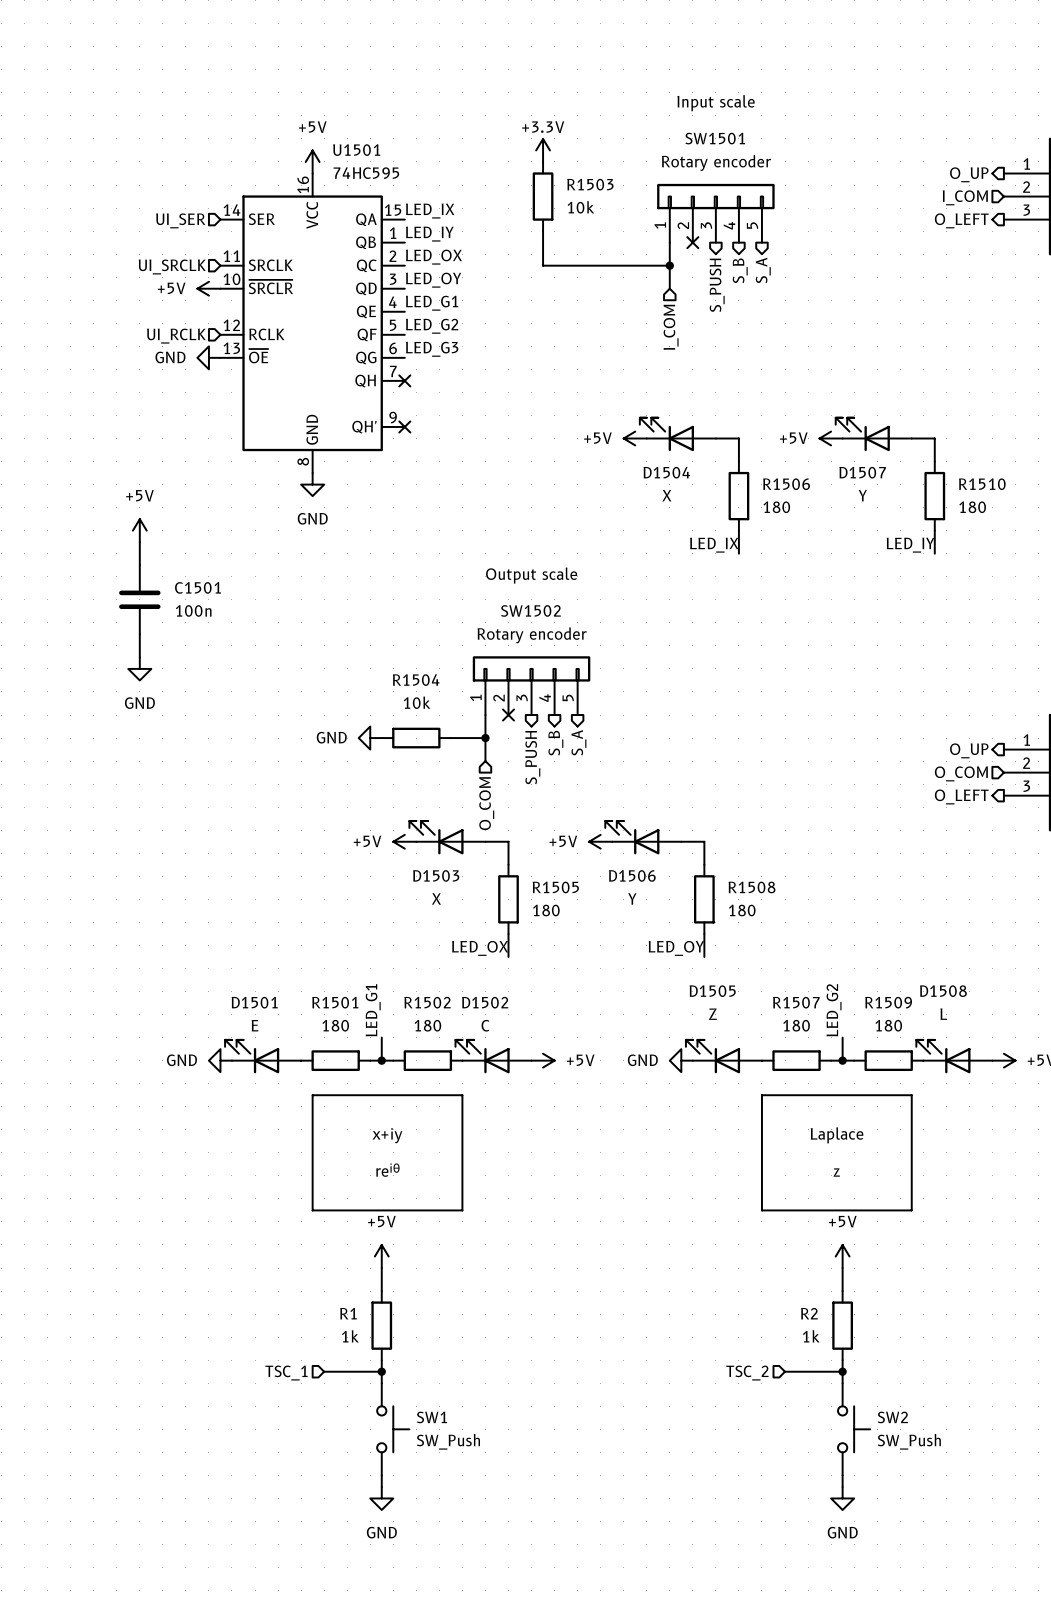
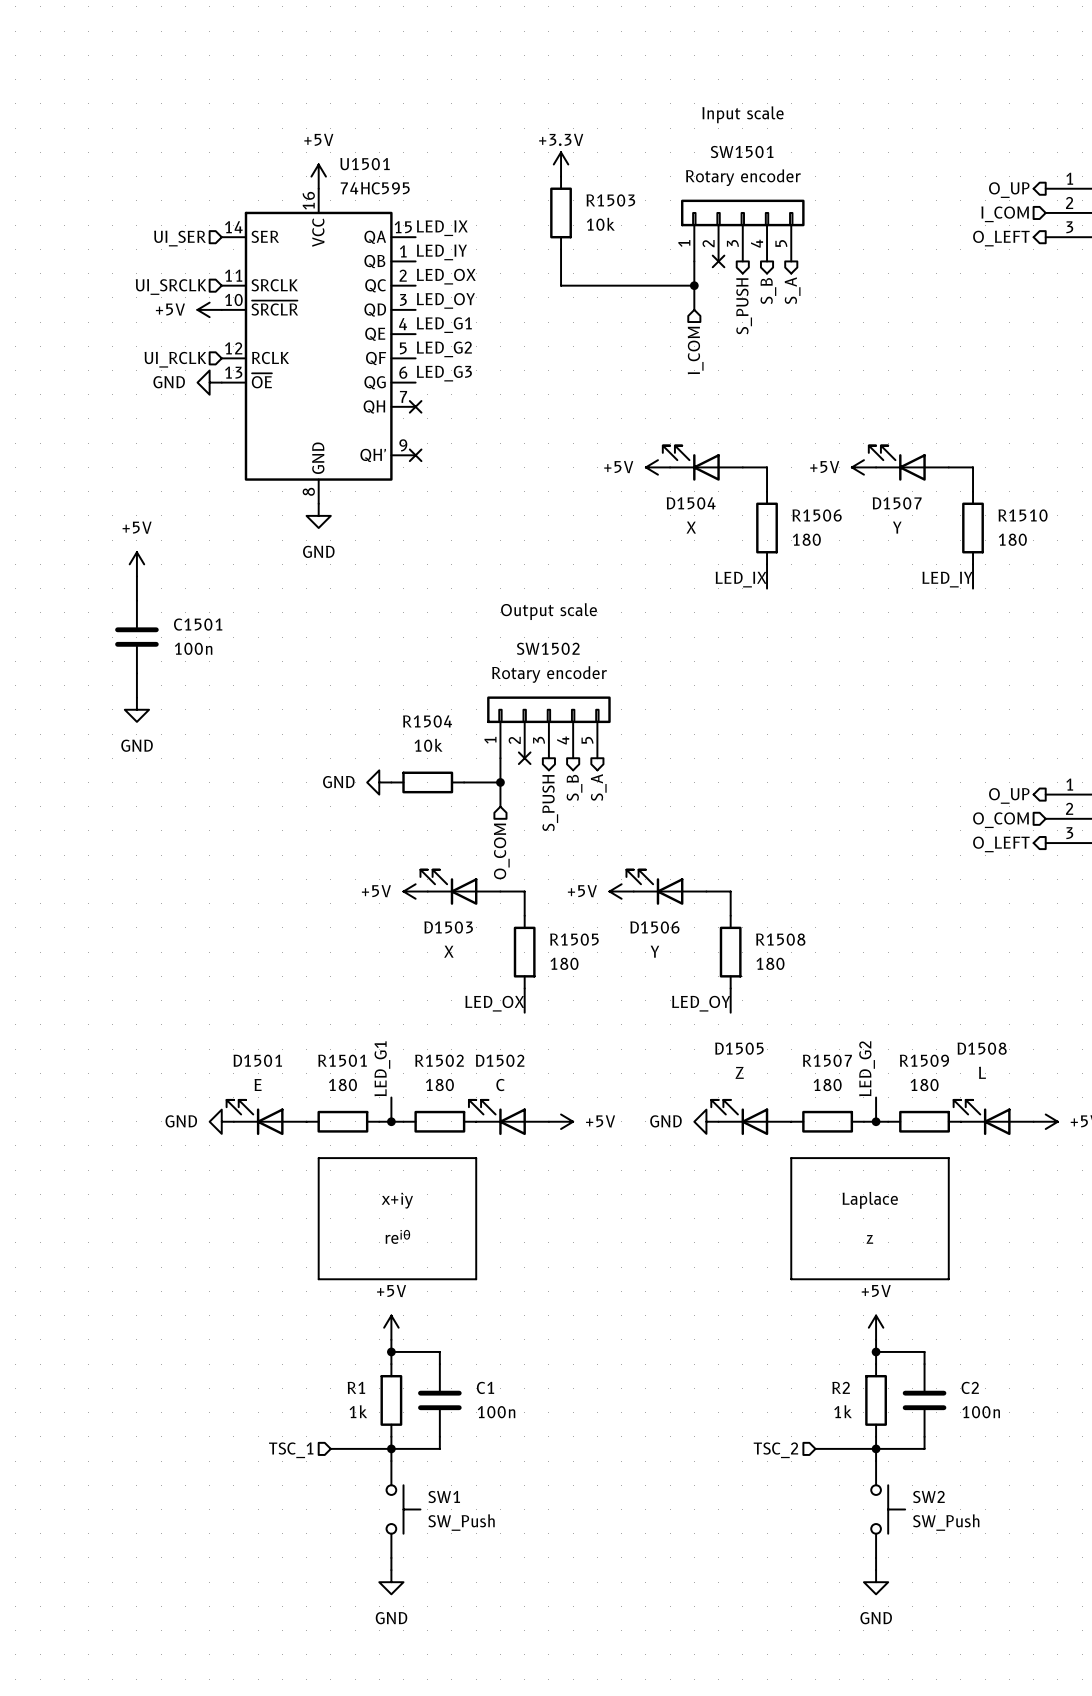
wire: none -> (391, 1351) (439, 1351) (439, 1364)
junction: none -> (391, 1351)
wire: none -> (876, 1351) (924, 1351) (924, 1364)
junction: none -> (876, 1351)
C1: none -> 100n (439, 1400)
C2: none -> 100n (924, 1400)
wire: none -> (439, 1436) (439, 1448) (391, 1448)
wire: none -> (924, 1436) (924, 1448) (876, 1448)

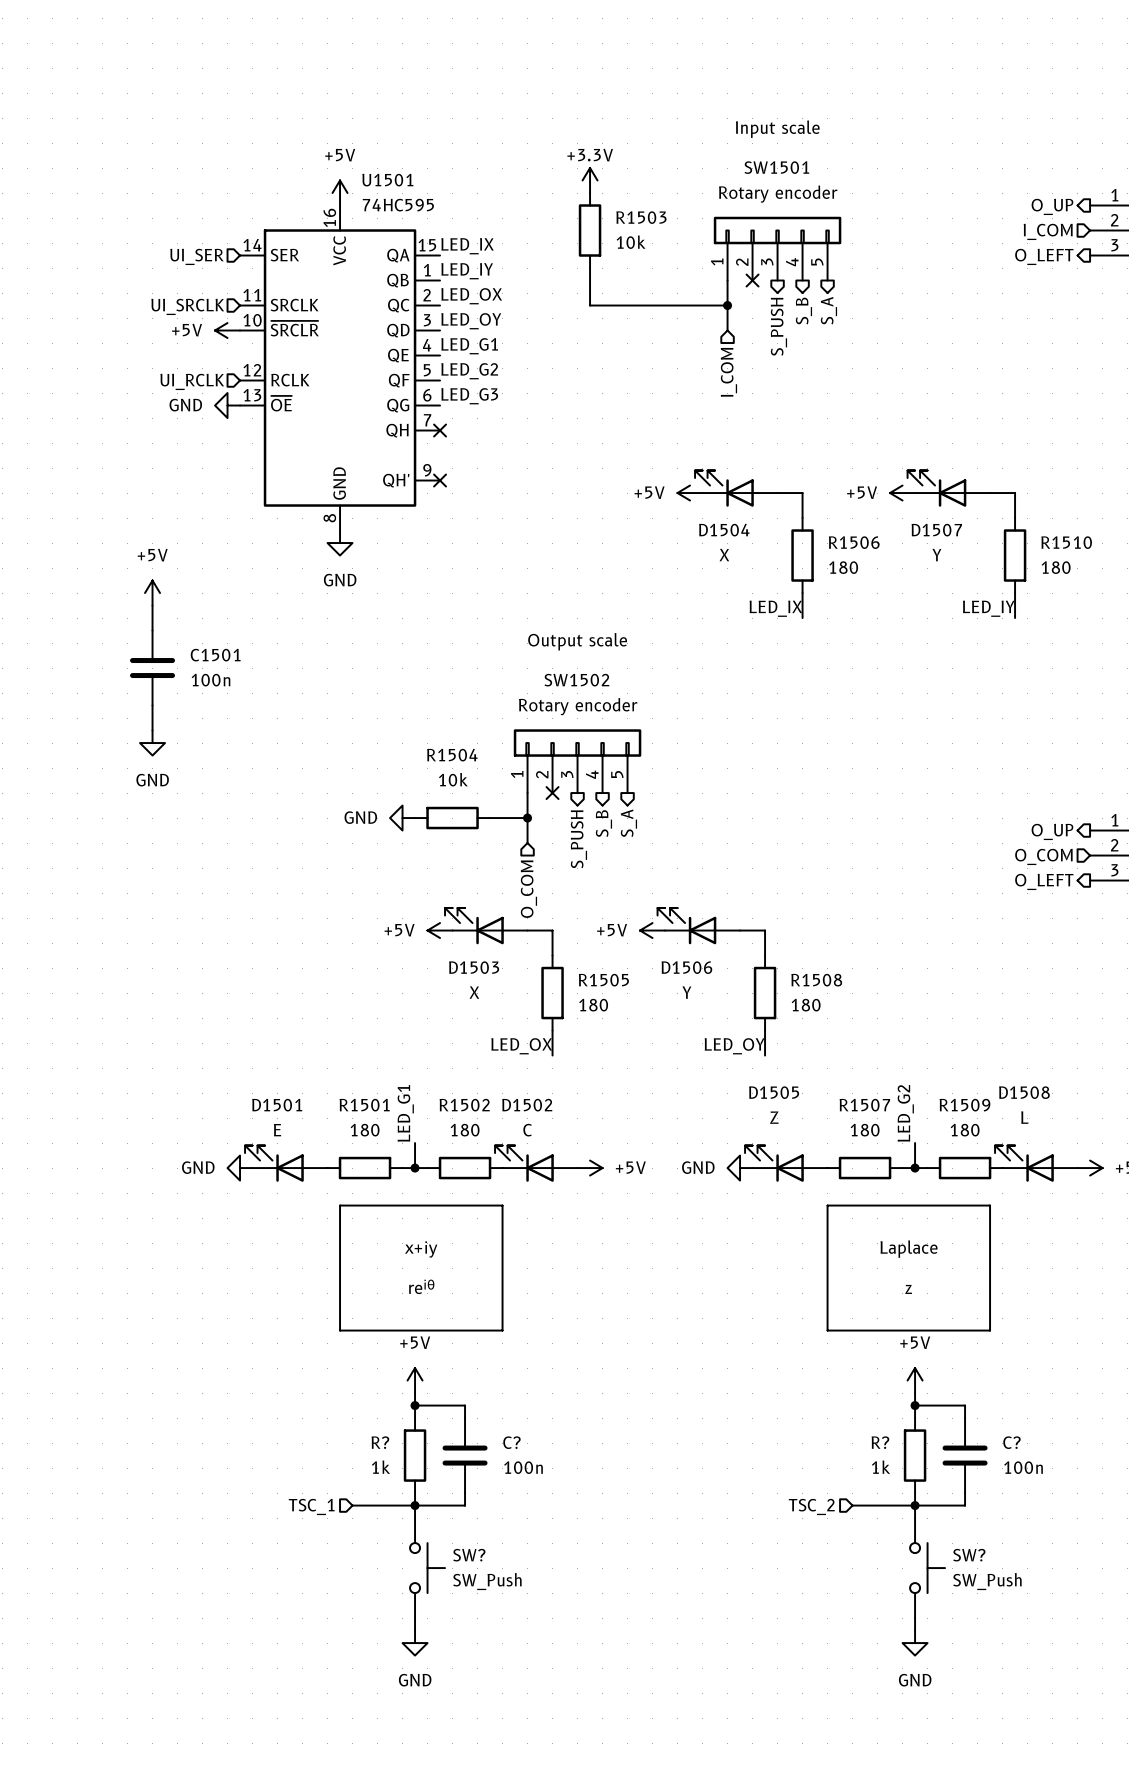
R1 name: R1 (356, 1387) -> R? (380, 1442)
C1 name: C1 (485, 1387) -> C? (511, 1442)
R2 name: R2 (841, 1387) -> R? (880, 1442)
C2 name: C2 (970, 1387) -> C? (1011, 1442)
SW1 name: SW1 (444, 1496) -> SW? (469, 1555)
SW2 name: SW2 (928, 1496) -> SW? (969, 1555)

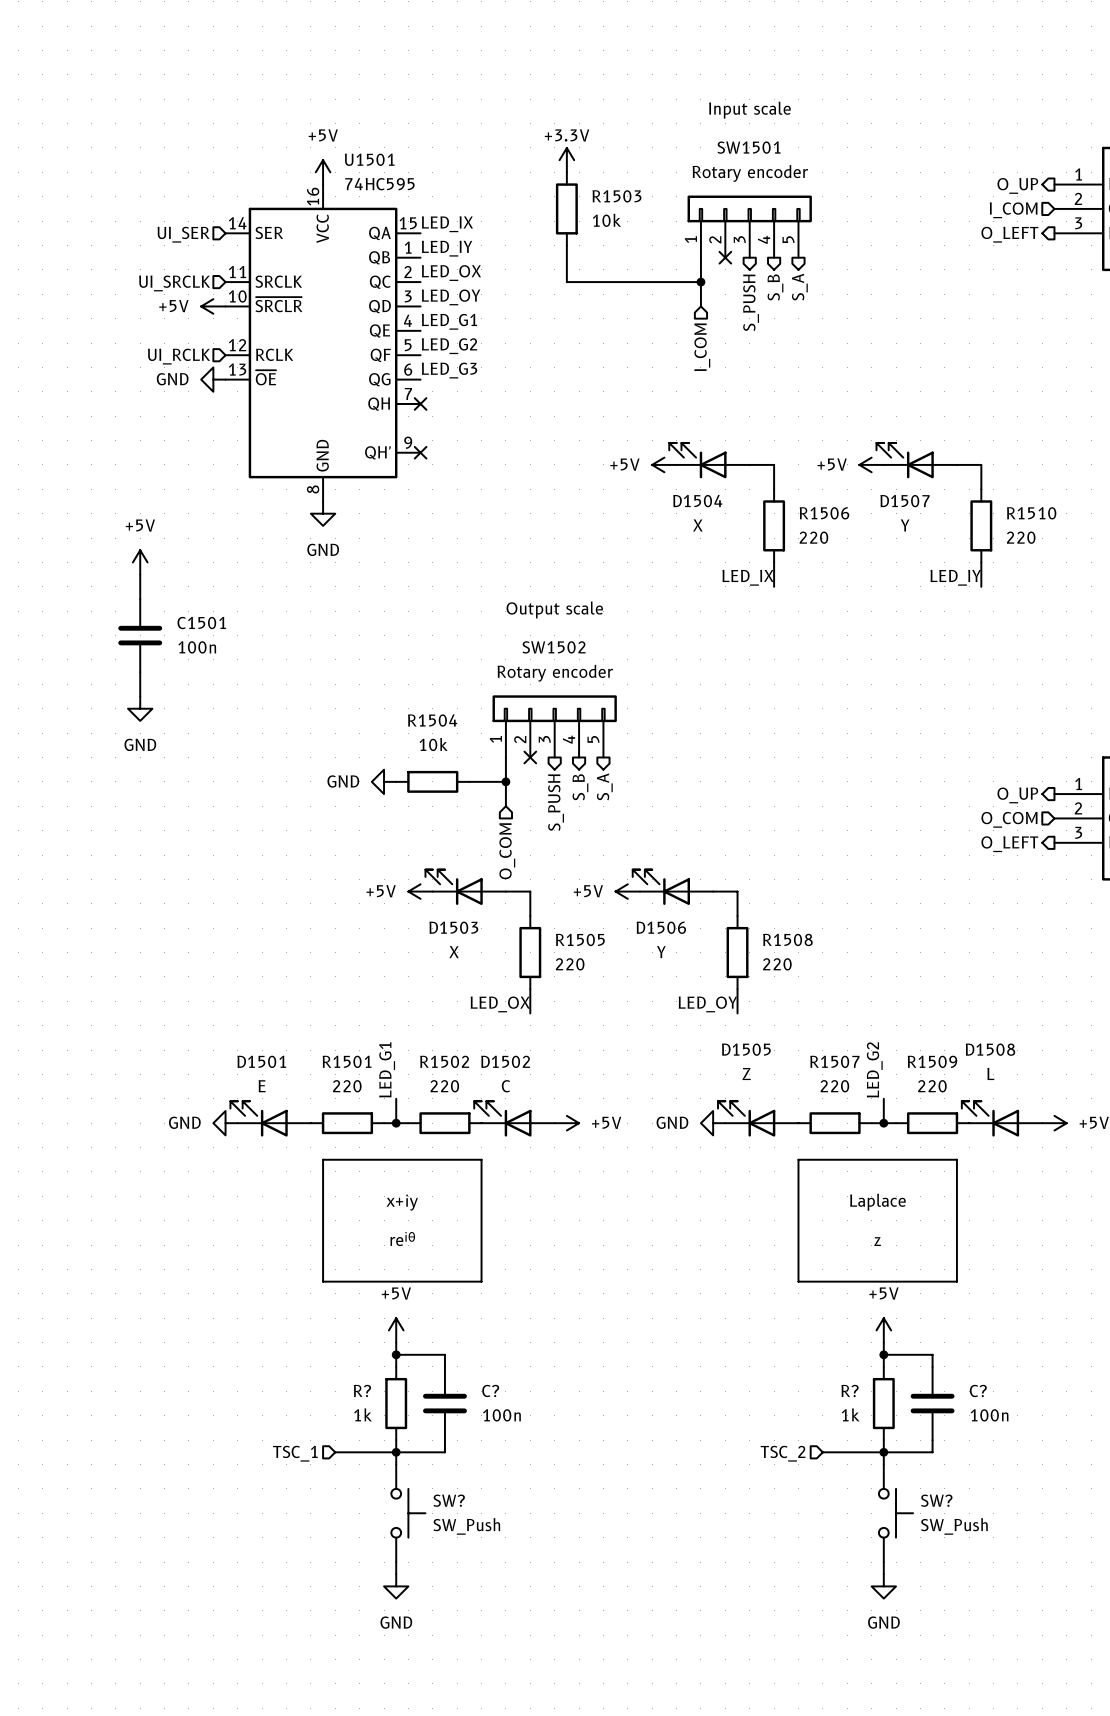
R1506 value: 180 (843, 567) -> 220 (813, 537)
R1510 value: 180 (1056, 567) -> 220 (1021, 537)
R1505 value: 180 (593, 1005) -> 220 (570, 964)
R1508 value: 180 (806, 1005) -> 220 (777, 964)
R1501 value: 180 (365, 1130) -> 220 (347, 1086)
R1502 value: 180 (465, 1130) -> 220 (444, 1086)
R1507 value: 180 (865, 1130) -> 220 (834, 1086)
R1509 value: 180 (965, 1130) -> 220 (932, 1086)

